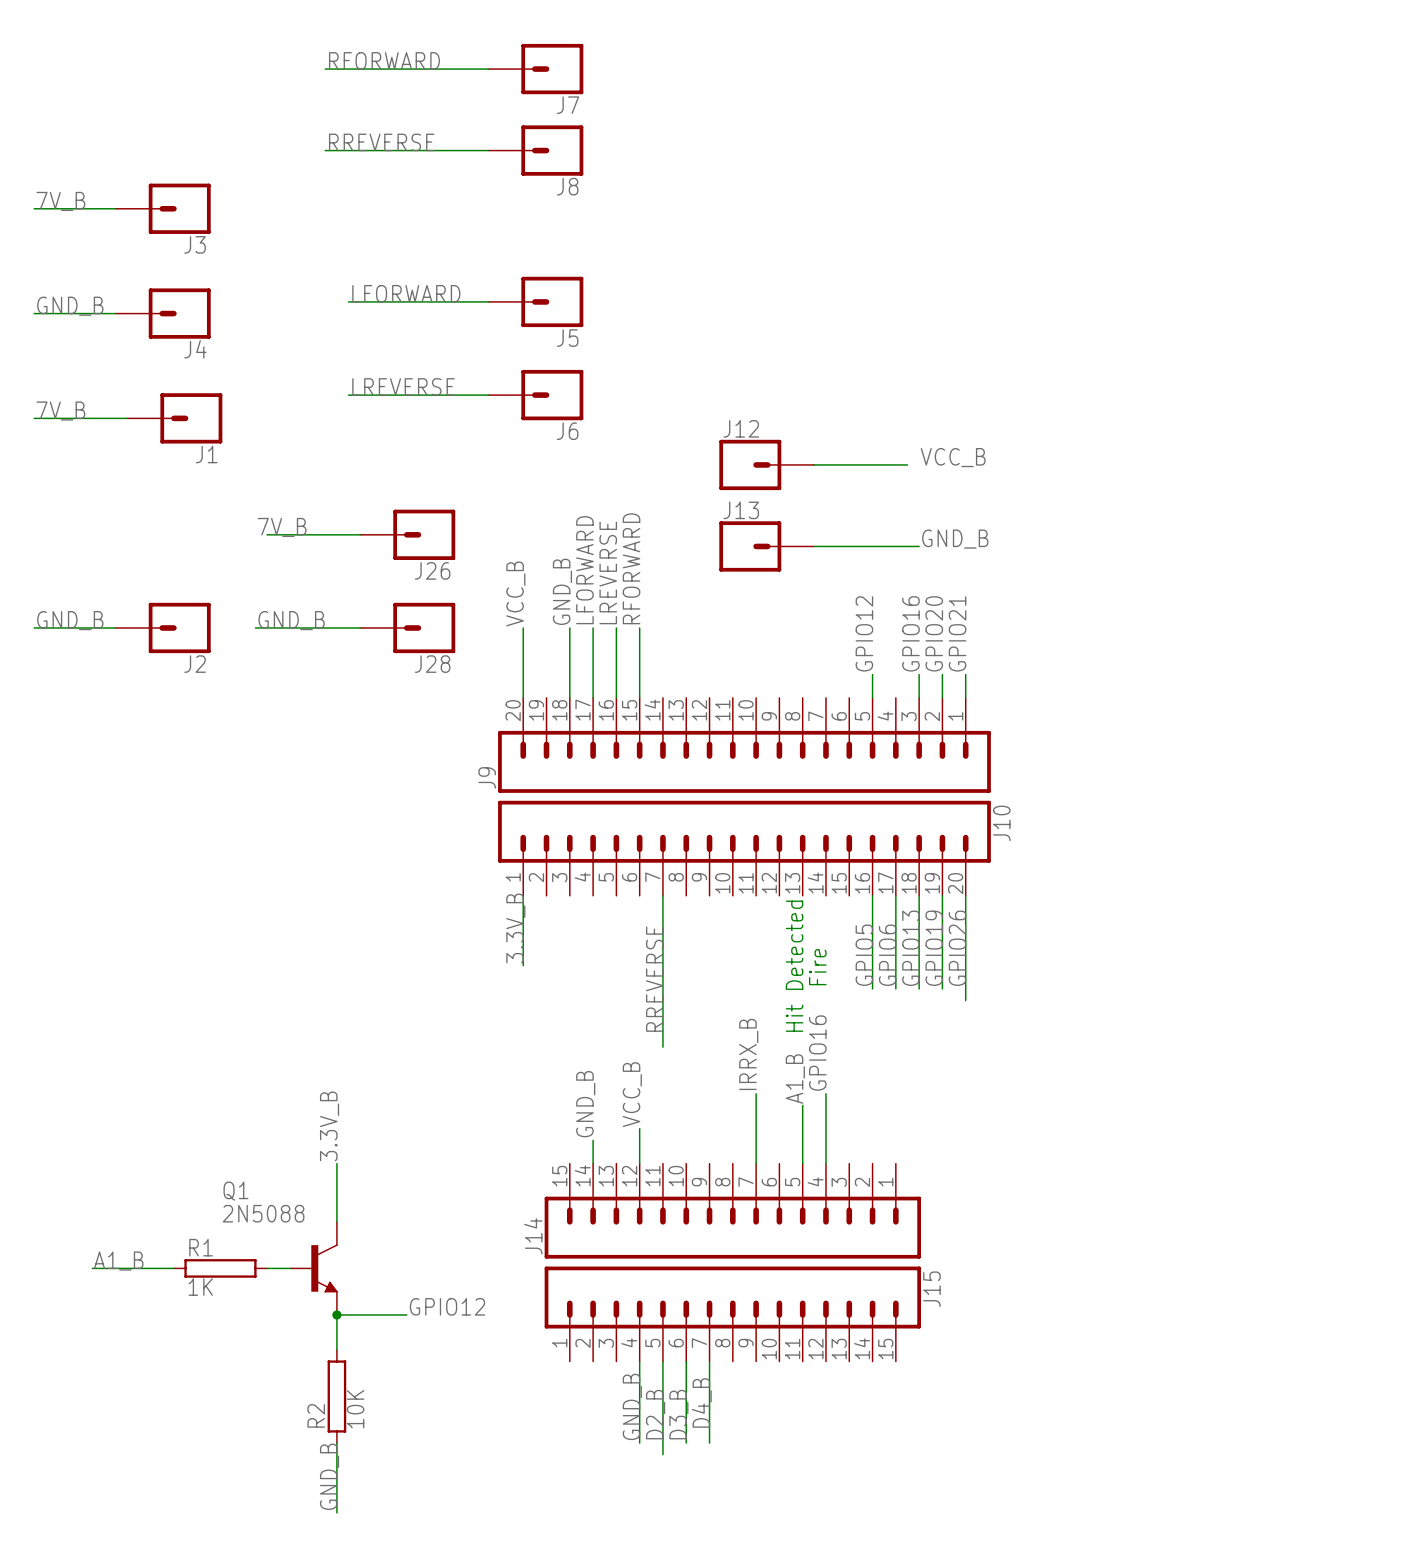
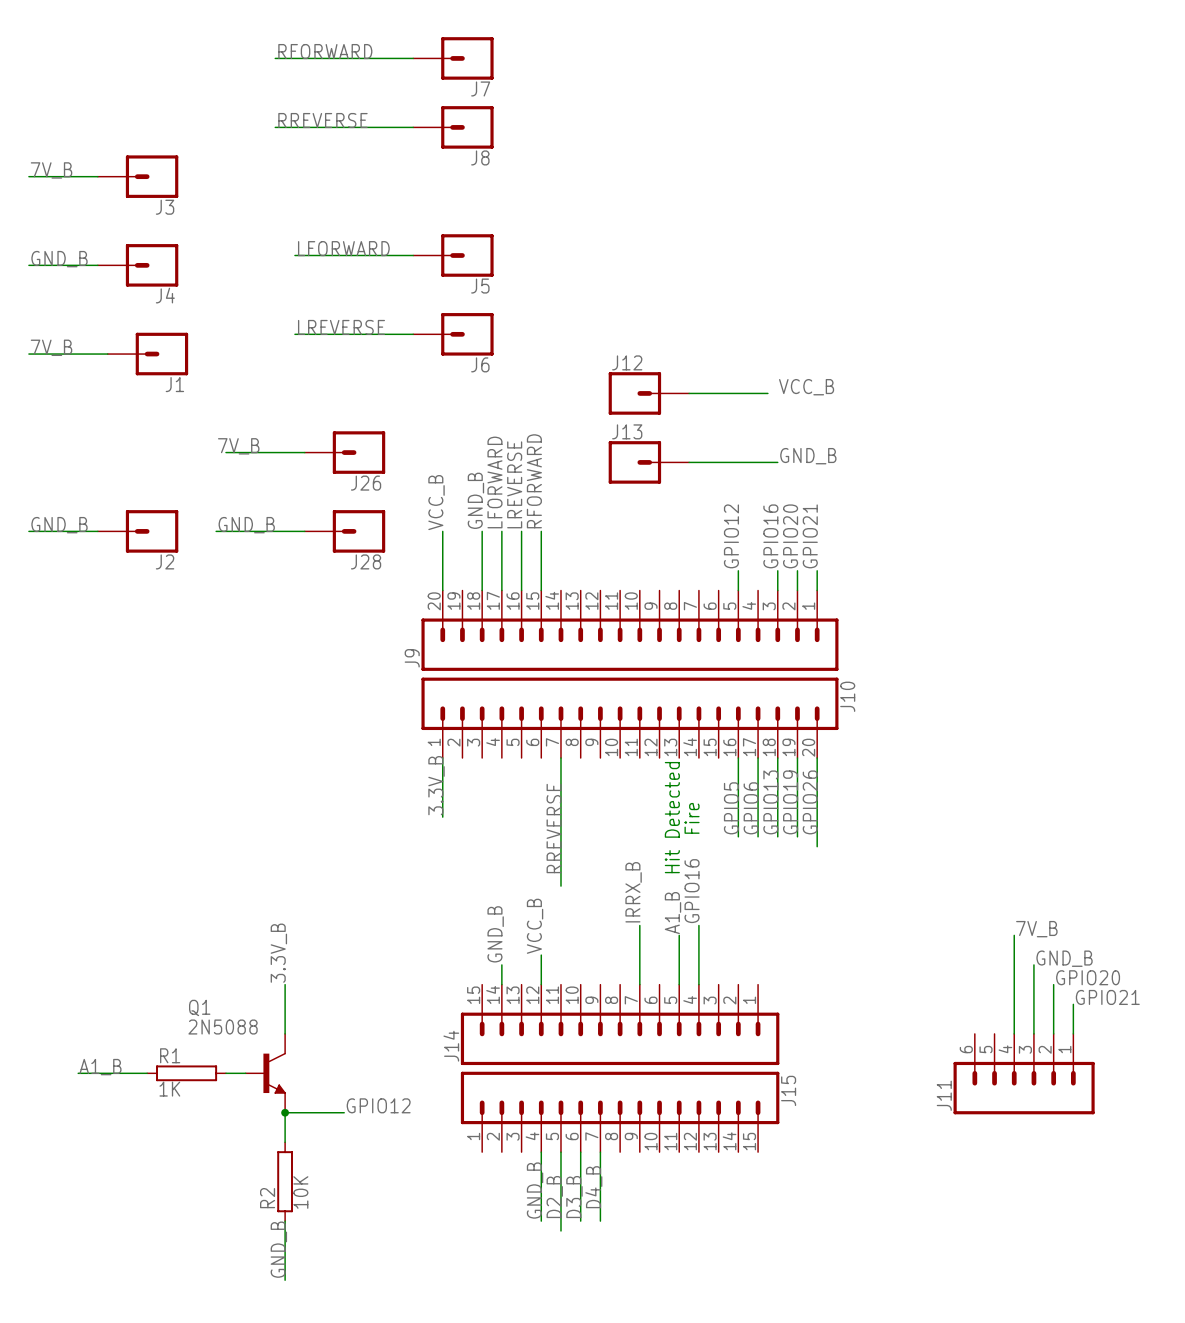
label: none -> 7V_B (1036, 929)
wire: none -> (1014, 935) (1014, 1033)
label: none -> GND_B (1064, 958)
wire: none -> (1033, 964) (1033, 1033)
label: none -> GPIO20 (1088, 977)
wire: none -> (1053, 984) (1053, 1033)
label: none -> GPIO21 (1107, 997)
wire: none -> (1073, 1004) (1073, 1033)
J11: none -> (1024, 1074)

